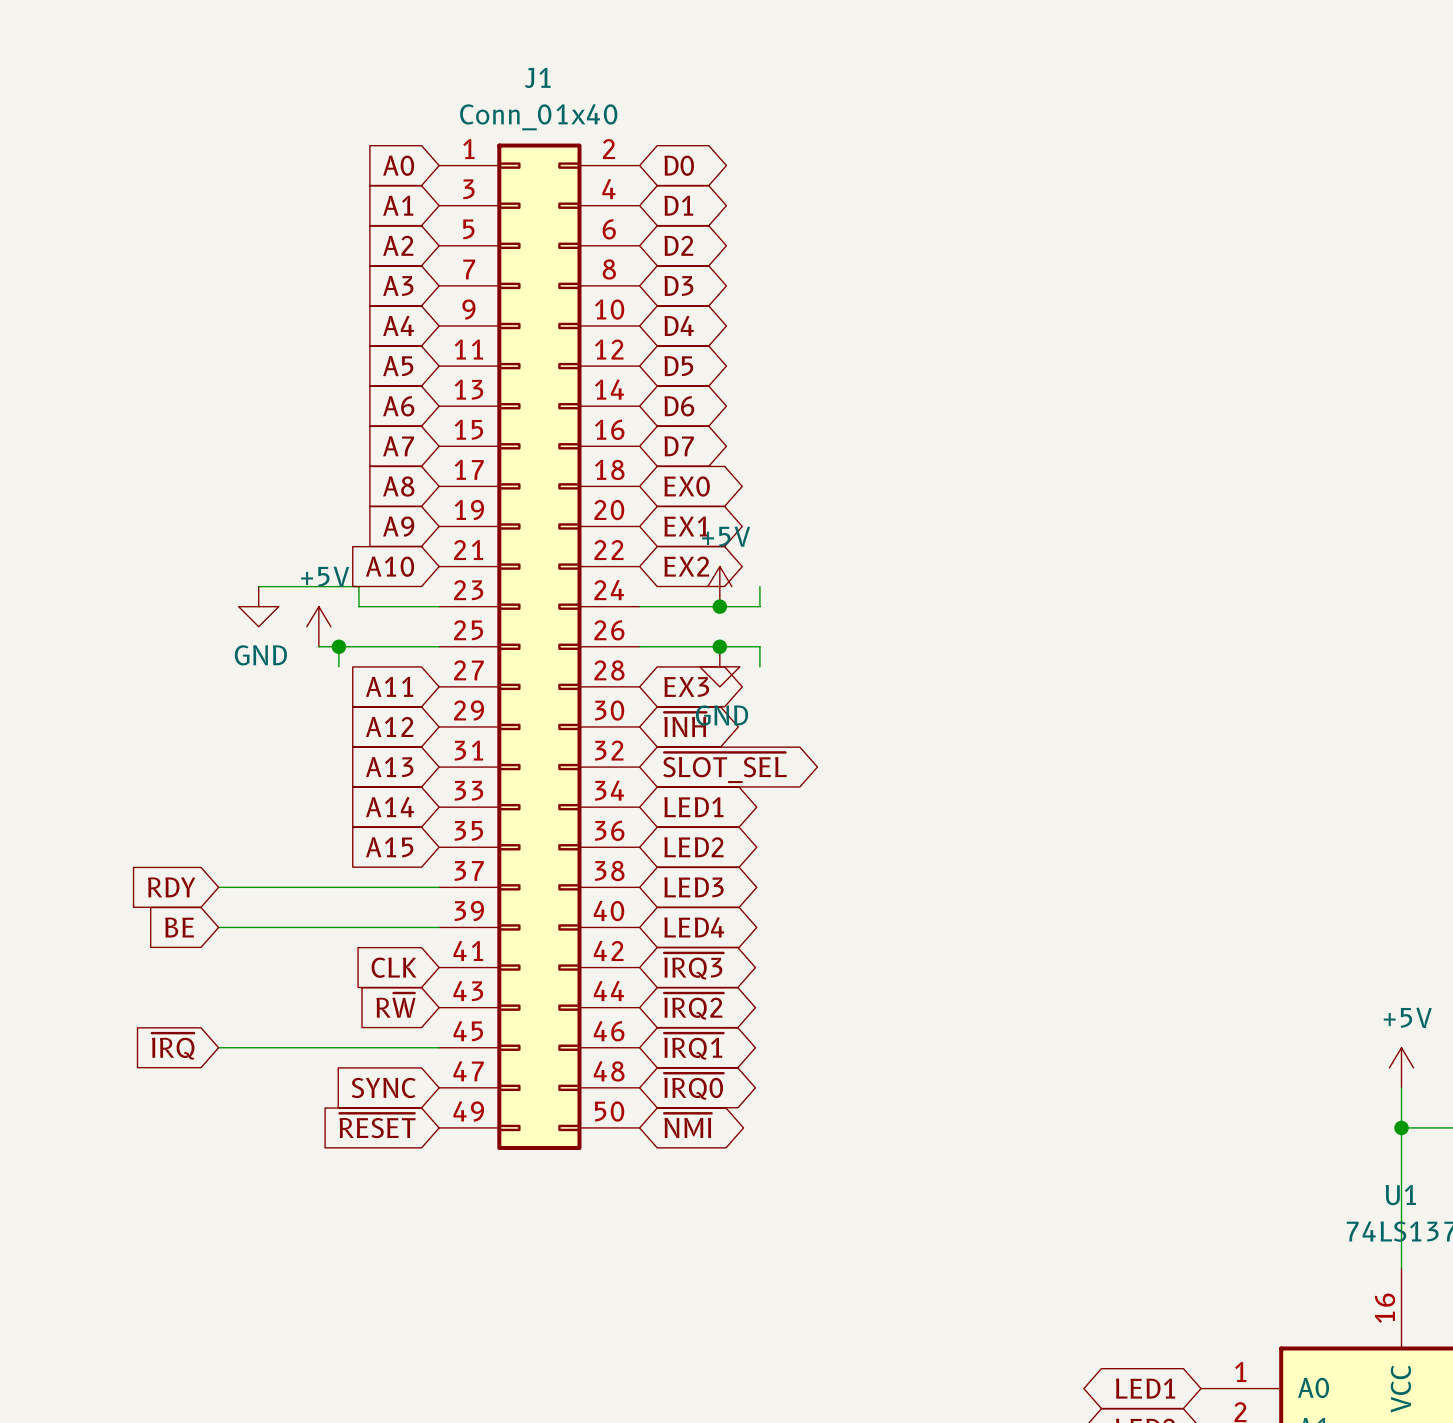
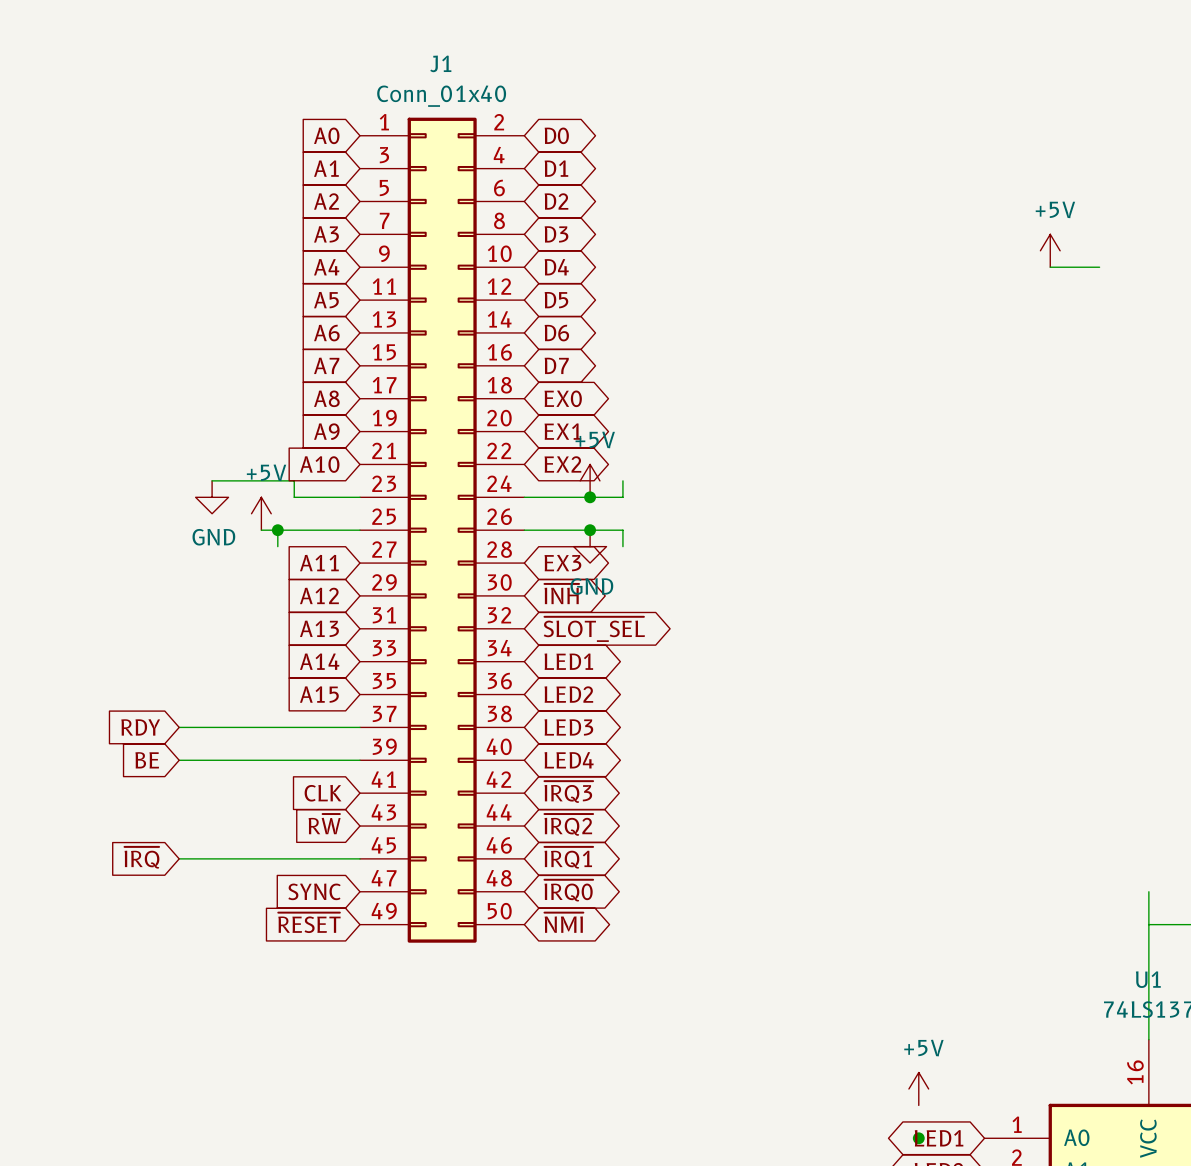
power symbol: none -> +5V (1050, 250)
wire: none -> (1050, 267) (1099, 267)
power symbol: +5V (1401, 1067) -> none
junction: (1401, 1127) -> none
power symbol: none -> +5V (918, 1088)
junction: none -> (918, 1138)

